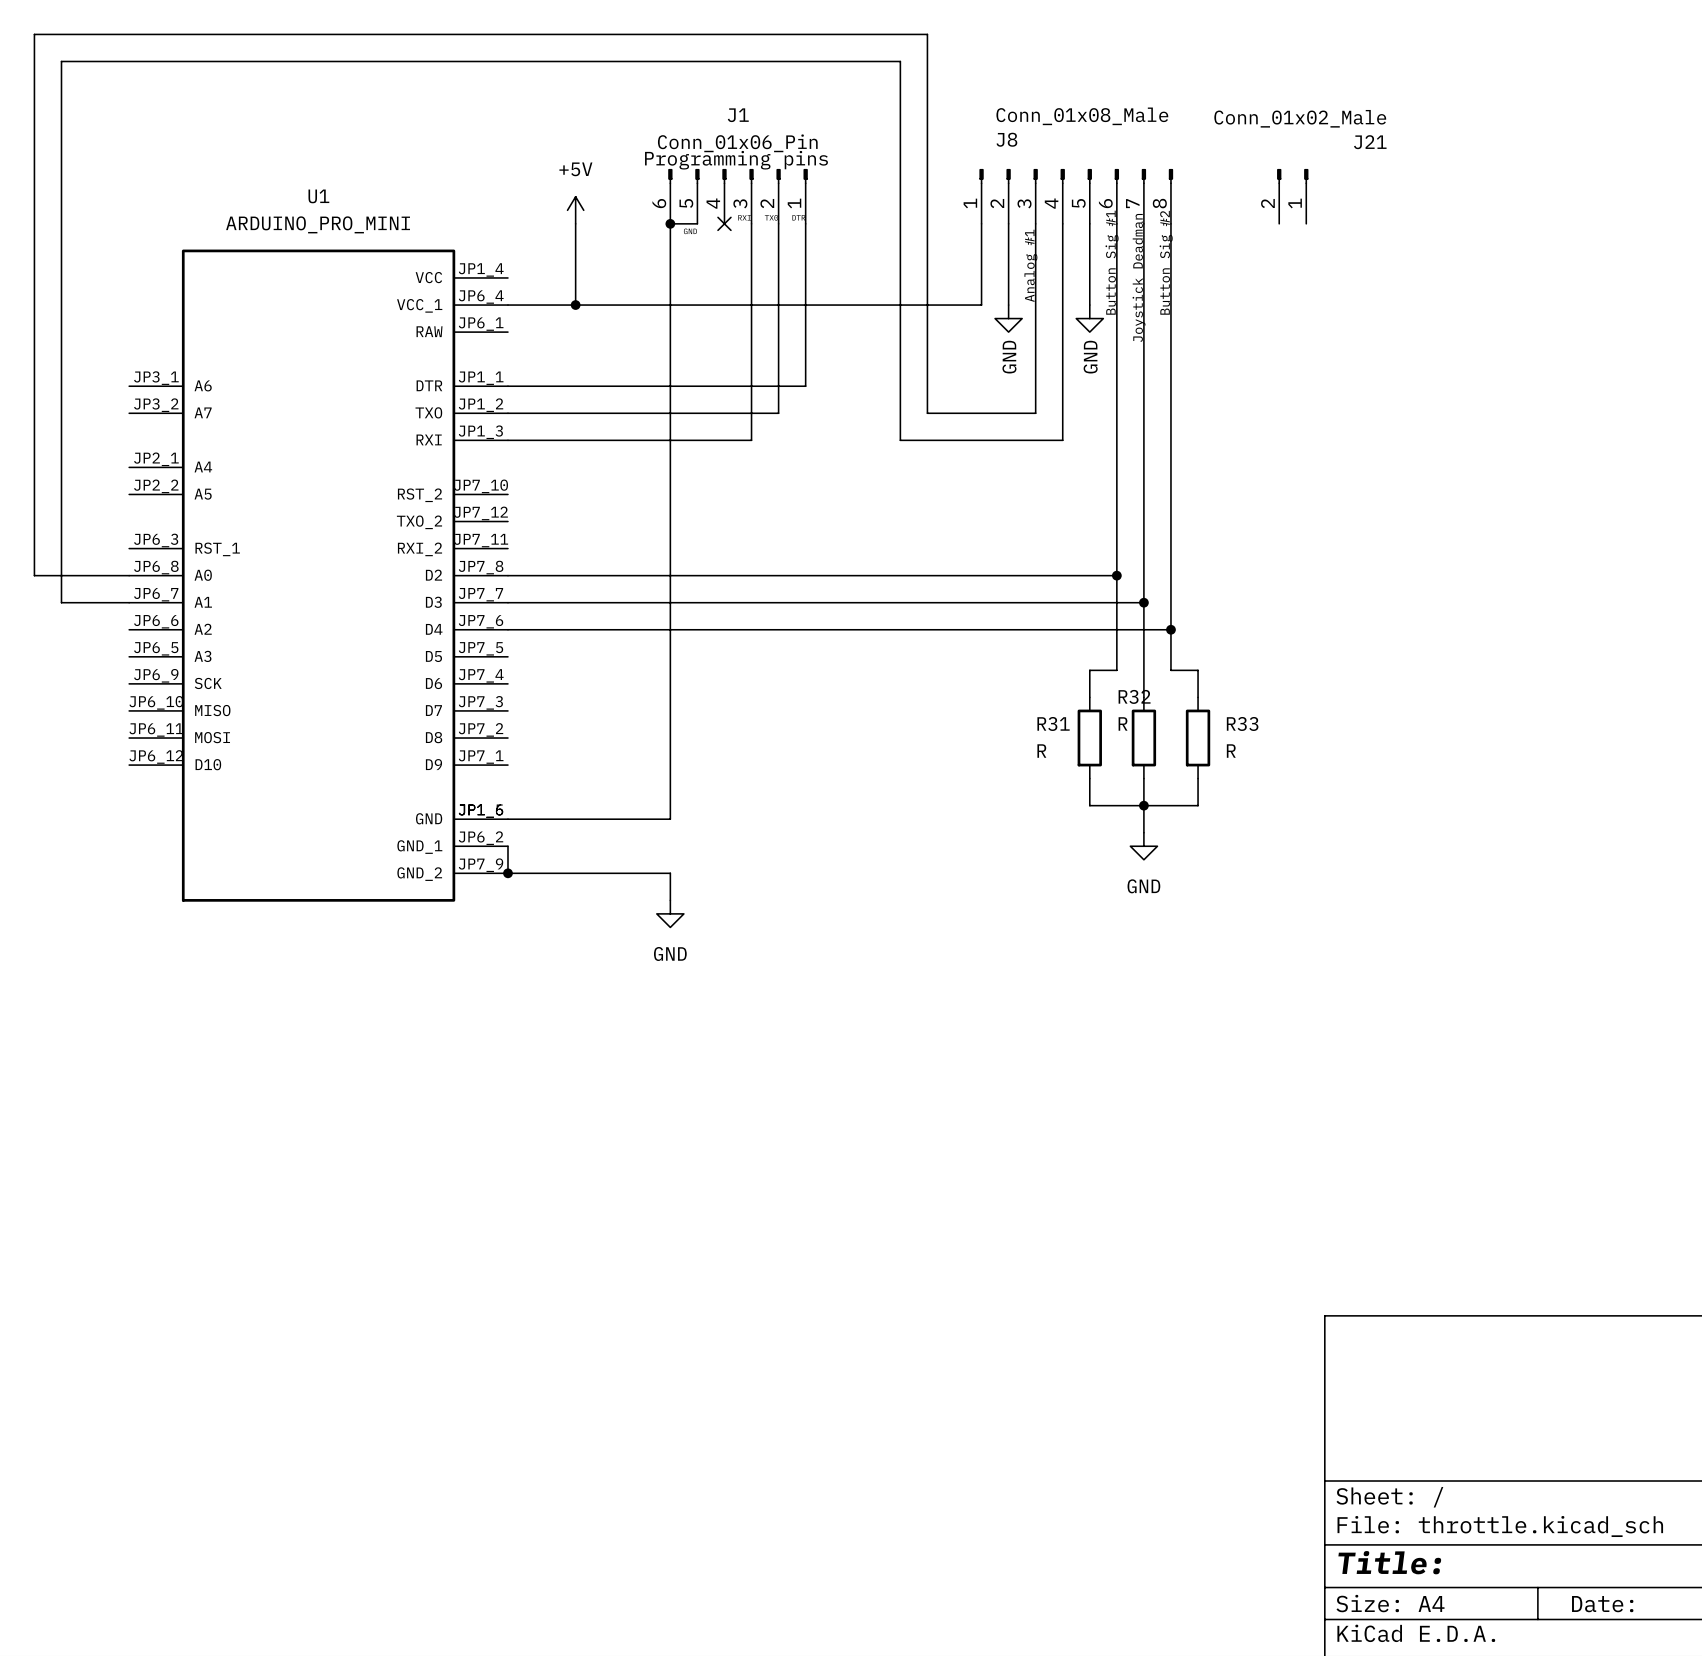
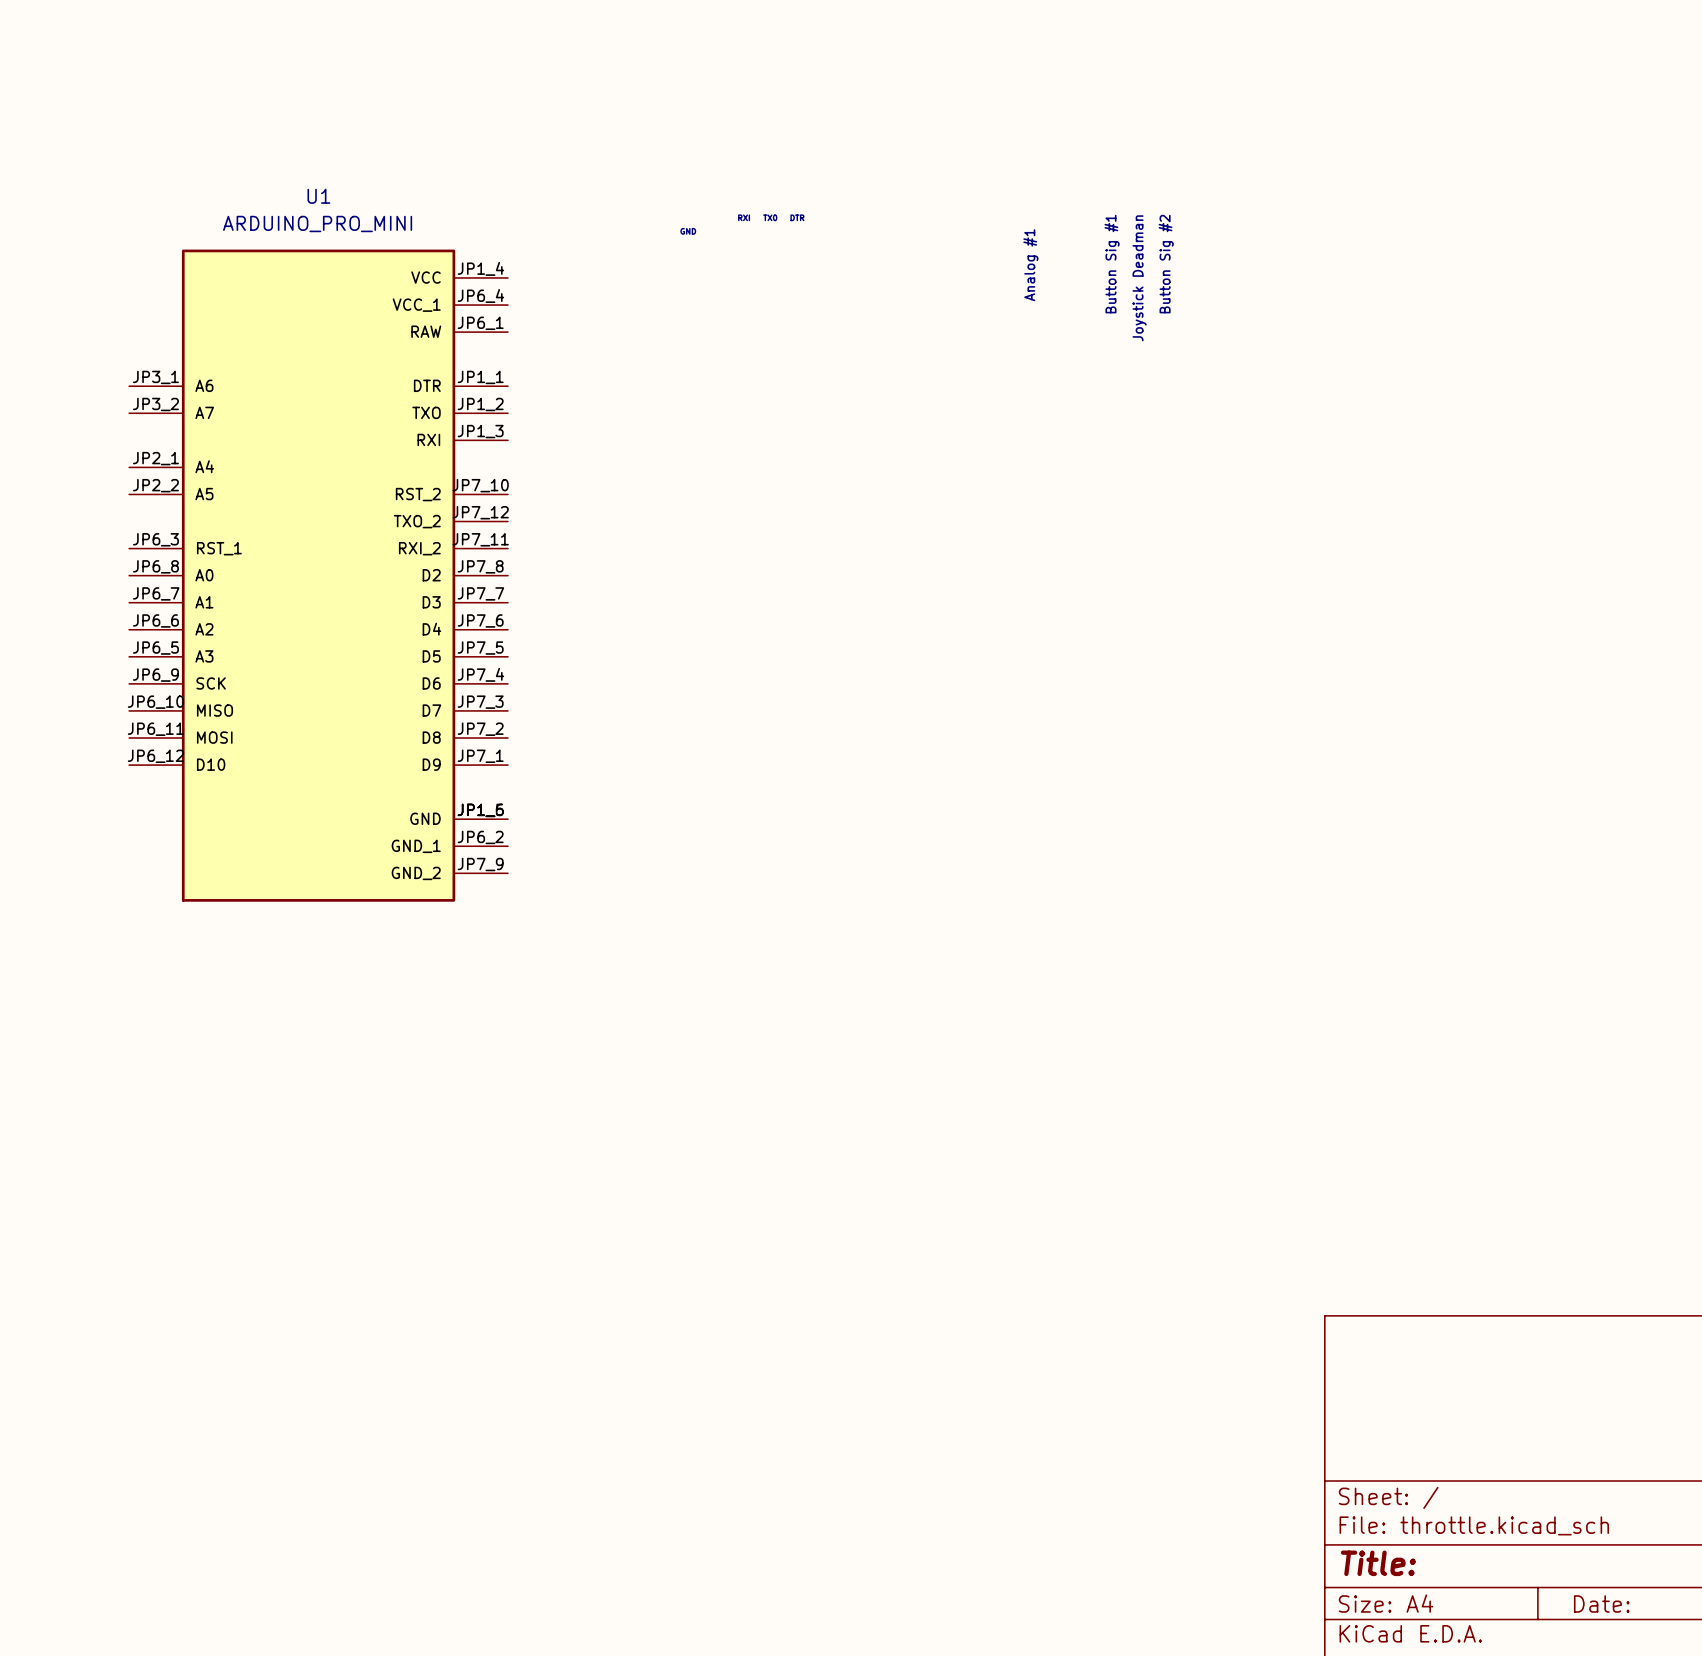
text: Programming pins (736, 160) -> none
J1: Conn_01x06_Pin (738, 196) -> none
J8: Conn_01x08_Male (1076, 196) -> none
J21: Conn_01x02_Male (1292, 196) -> none
power symbol: +5V (575, 210) -> none
wire: (575, 223) (575, 305) -> none
junction: (670, 223) -> none
wire: (697, 223) (670, 223) (670, 819) (507, 819) -> none
no-connect mark: (724, 223) -> none
wire: (751, 223) (751, 440) (507, 440) -> none
wire: (778, 223) (778, 413) (507, 413) -> none
wire: (805, 223) (805, 386) (507, 386) -> none
wire: (981, 223) (981, 305) (507, 305) -> none
wire: (1008, 223) (1008, 305) -> none
wire: (1035, 223) (1035, 413) (927, 413) (927, 34) (34, 34) (34, 575) (129, 575) -> none
wire: (1062, 223) (1062, 440) (900, 440) (900, 61) (61, 61) (61, 602) (129, 602) -> none
wire: (1089, 223) (1089, 305) -> none
wire: (1116, 223) (1116, 670) (1089, 670) (1089, 697) -> none
wire: (1143, 223) (1143, 697) -> none
wire: (1170, 223) (1170, 670) (1198, 670) (1198, 697) -> none
junction: (575, 305) -> none
power symbol: GND (1008, 318) -> none
power symbol: GND (1089, 318) -> none
wire: (507, 575) (1116, 575) -> none
junction: (1116, 575) -> none
wire: (507, 602) (1143, 602) -> none
junction: (1143, 602) -> none
wire: (507, 629) (1170, 629) -> none
junction: (1170, 629) -> none
R31: R (1089, 738) -> none
R32: R (1143, 738) -> none
R33: R (1198, 738) -> none
wire: (1089, 778) (1089, 805) (1198, 805) (1198, 778) -> none
wire: (1143, 778) (1143, 832) -> none
junction: (1143, 805) -> none
wire: (507, 846) (507, 873) (670, 873) (670, 900) -> none
power symbol: GND (1143, 846) -> none
junction: (507, 873) -> none
power symbol: GND (670, 913) -> none

